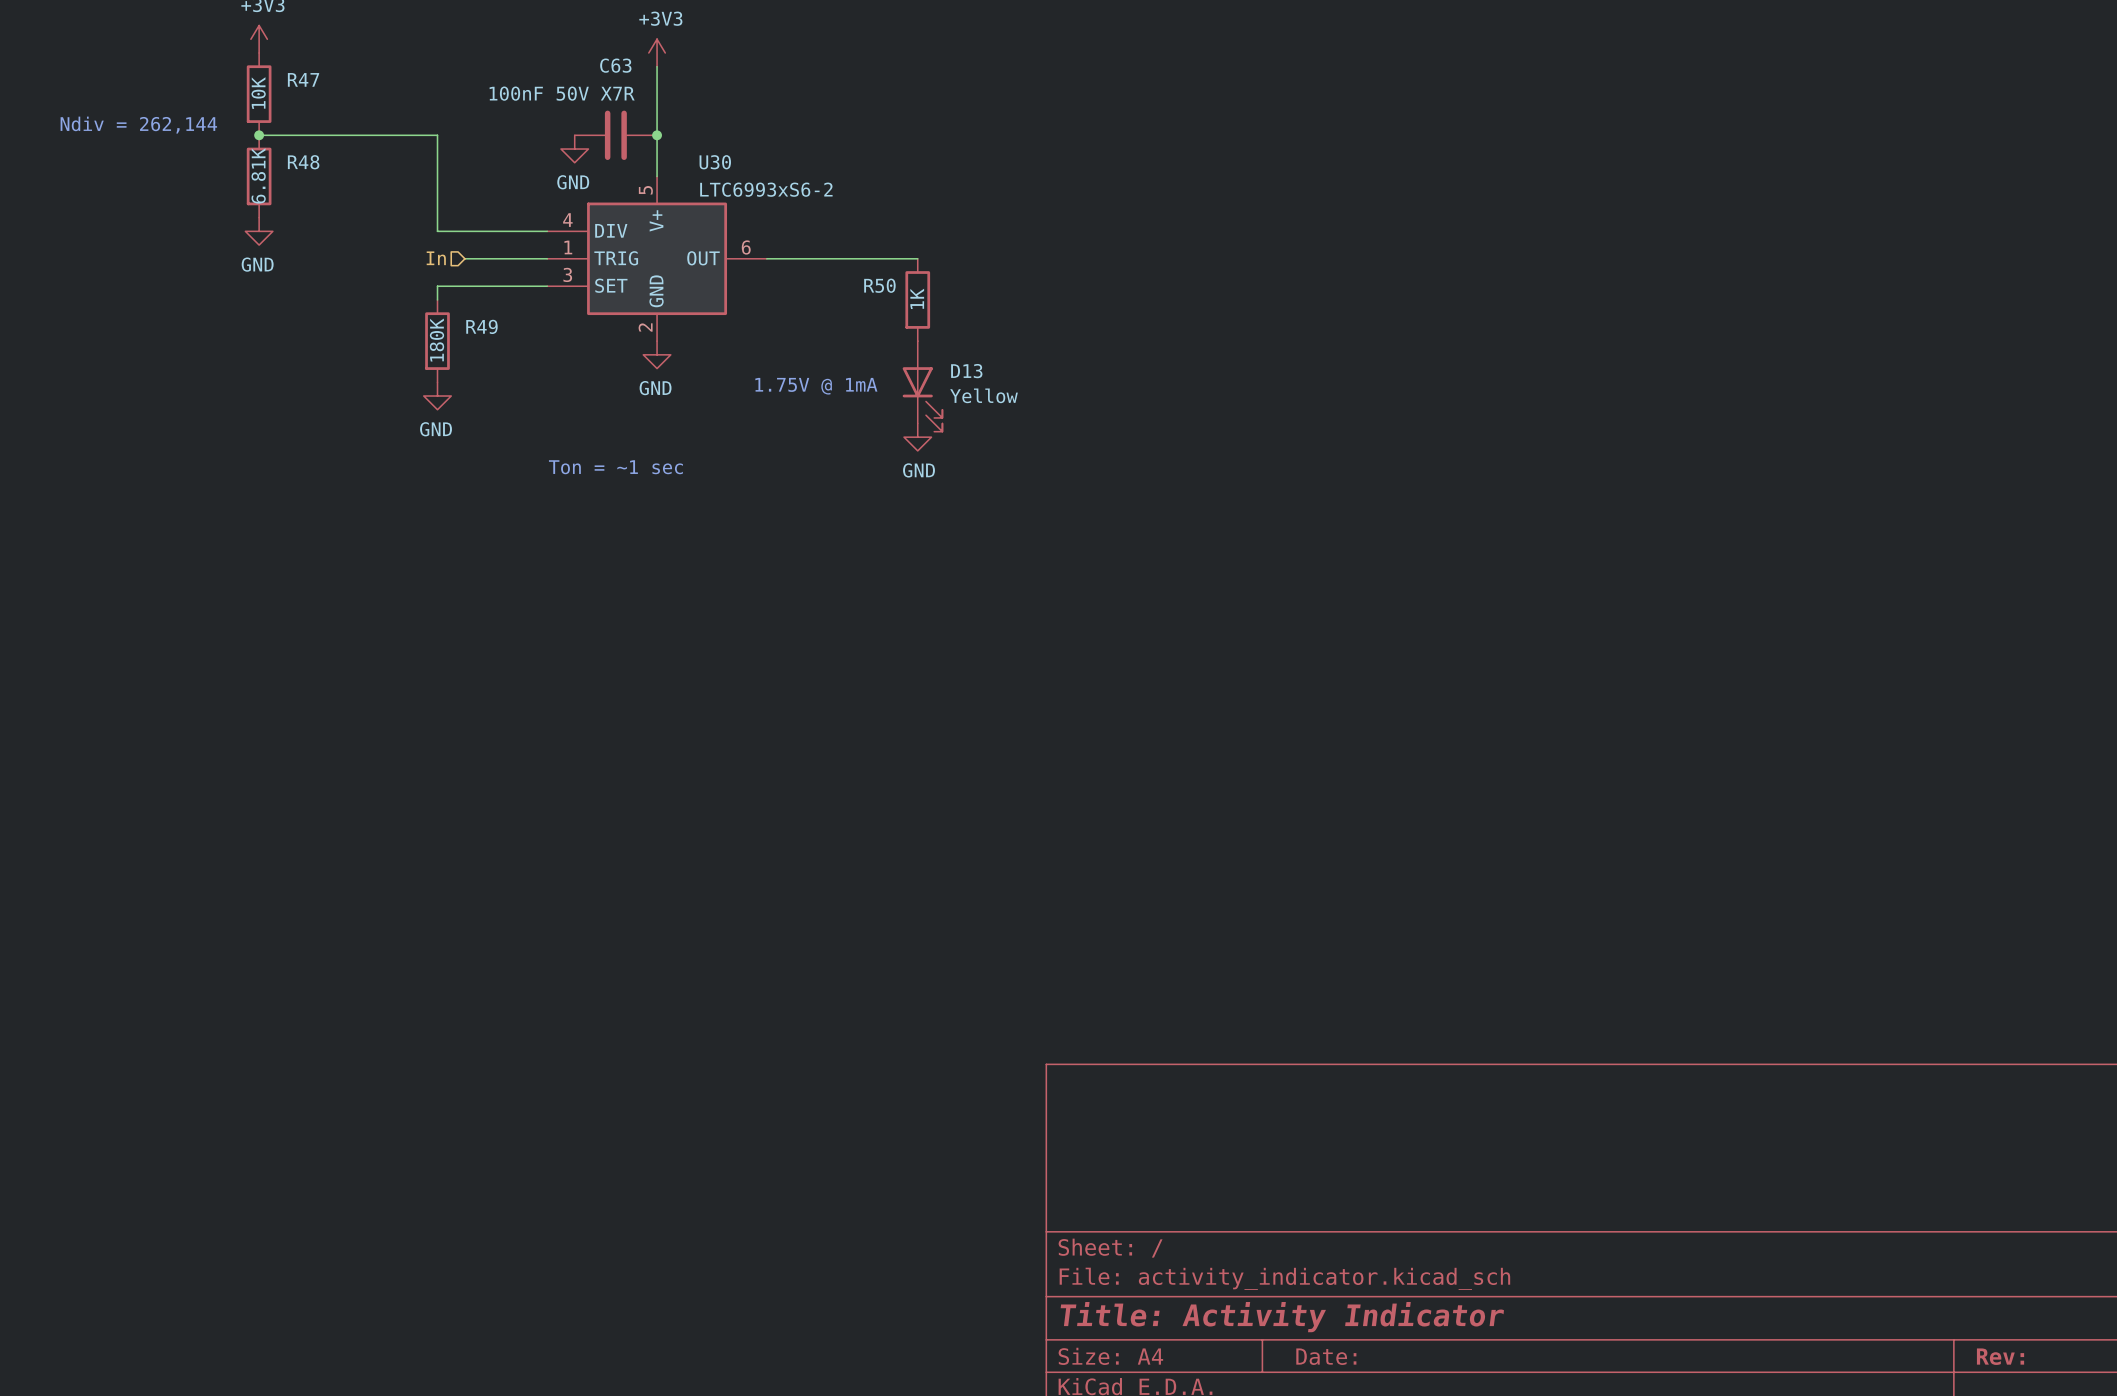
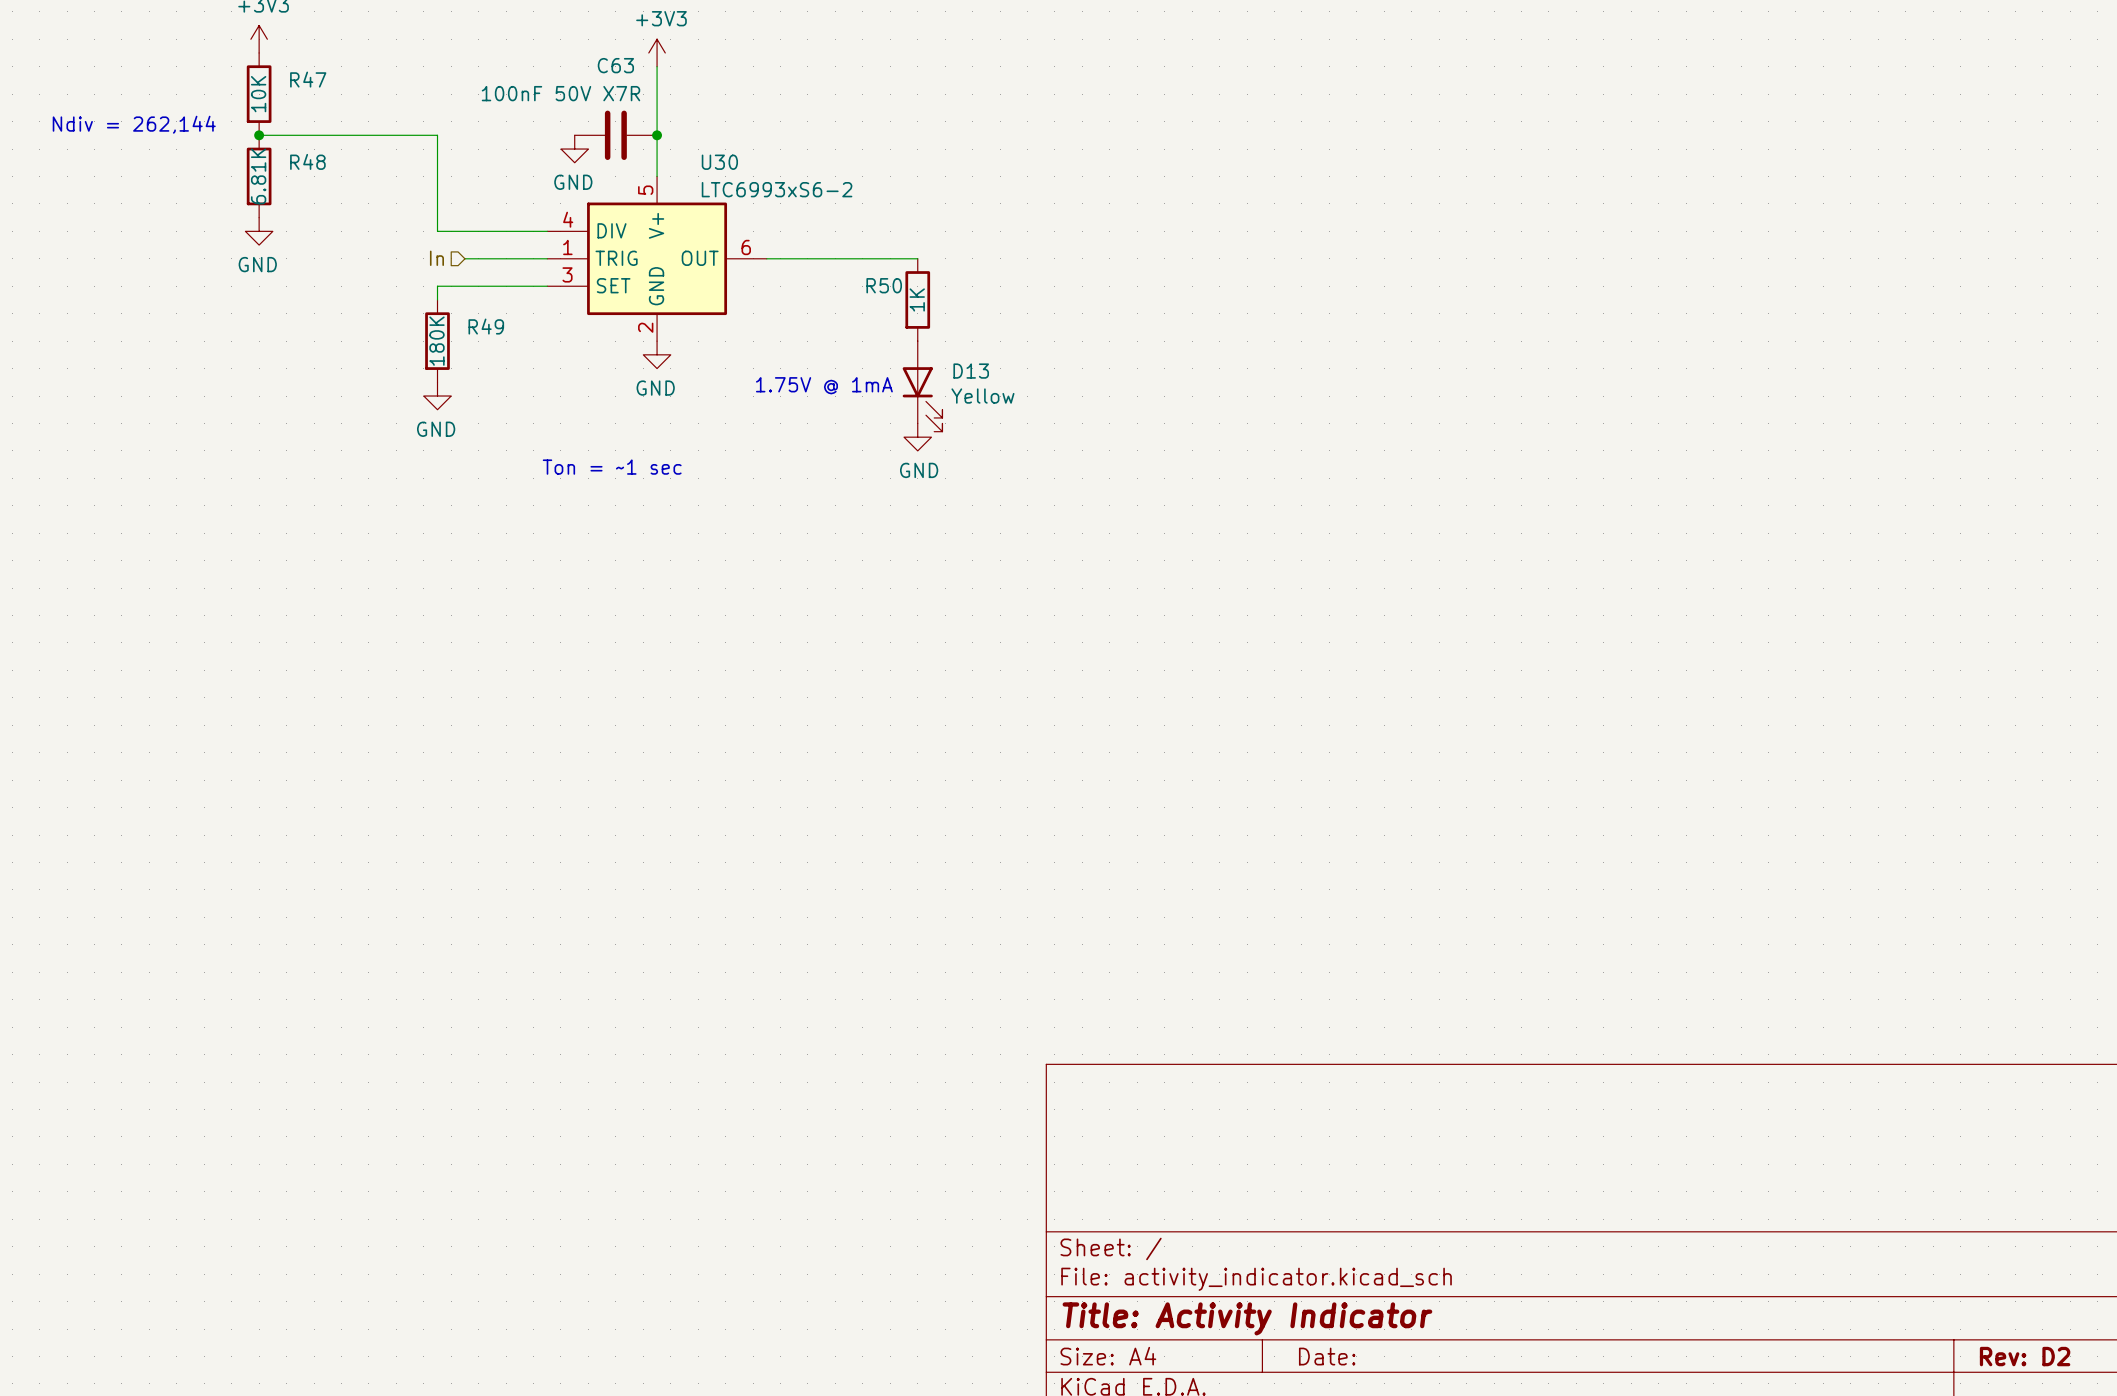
title block: Rev: (2000, 1356) -> Rev: D2 (2025, 1356)

